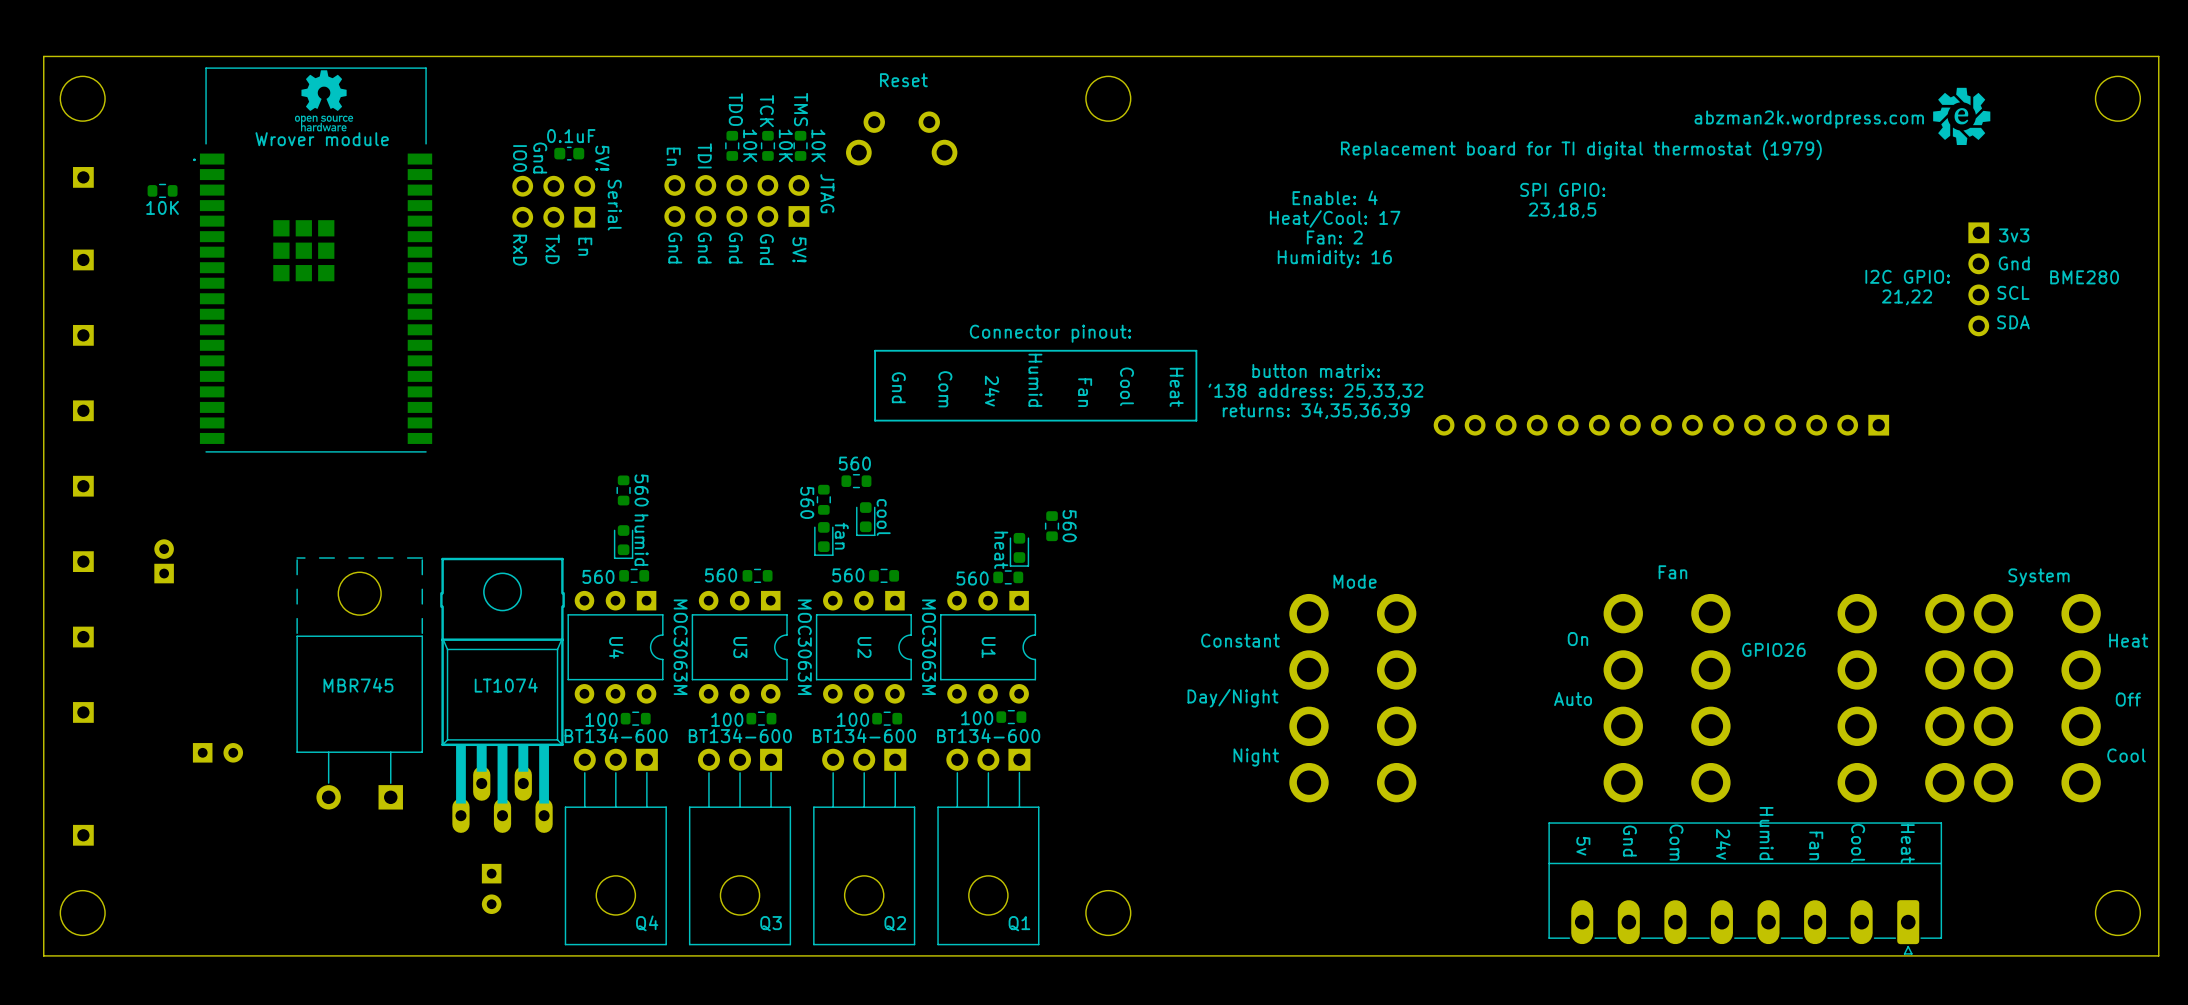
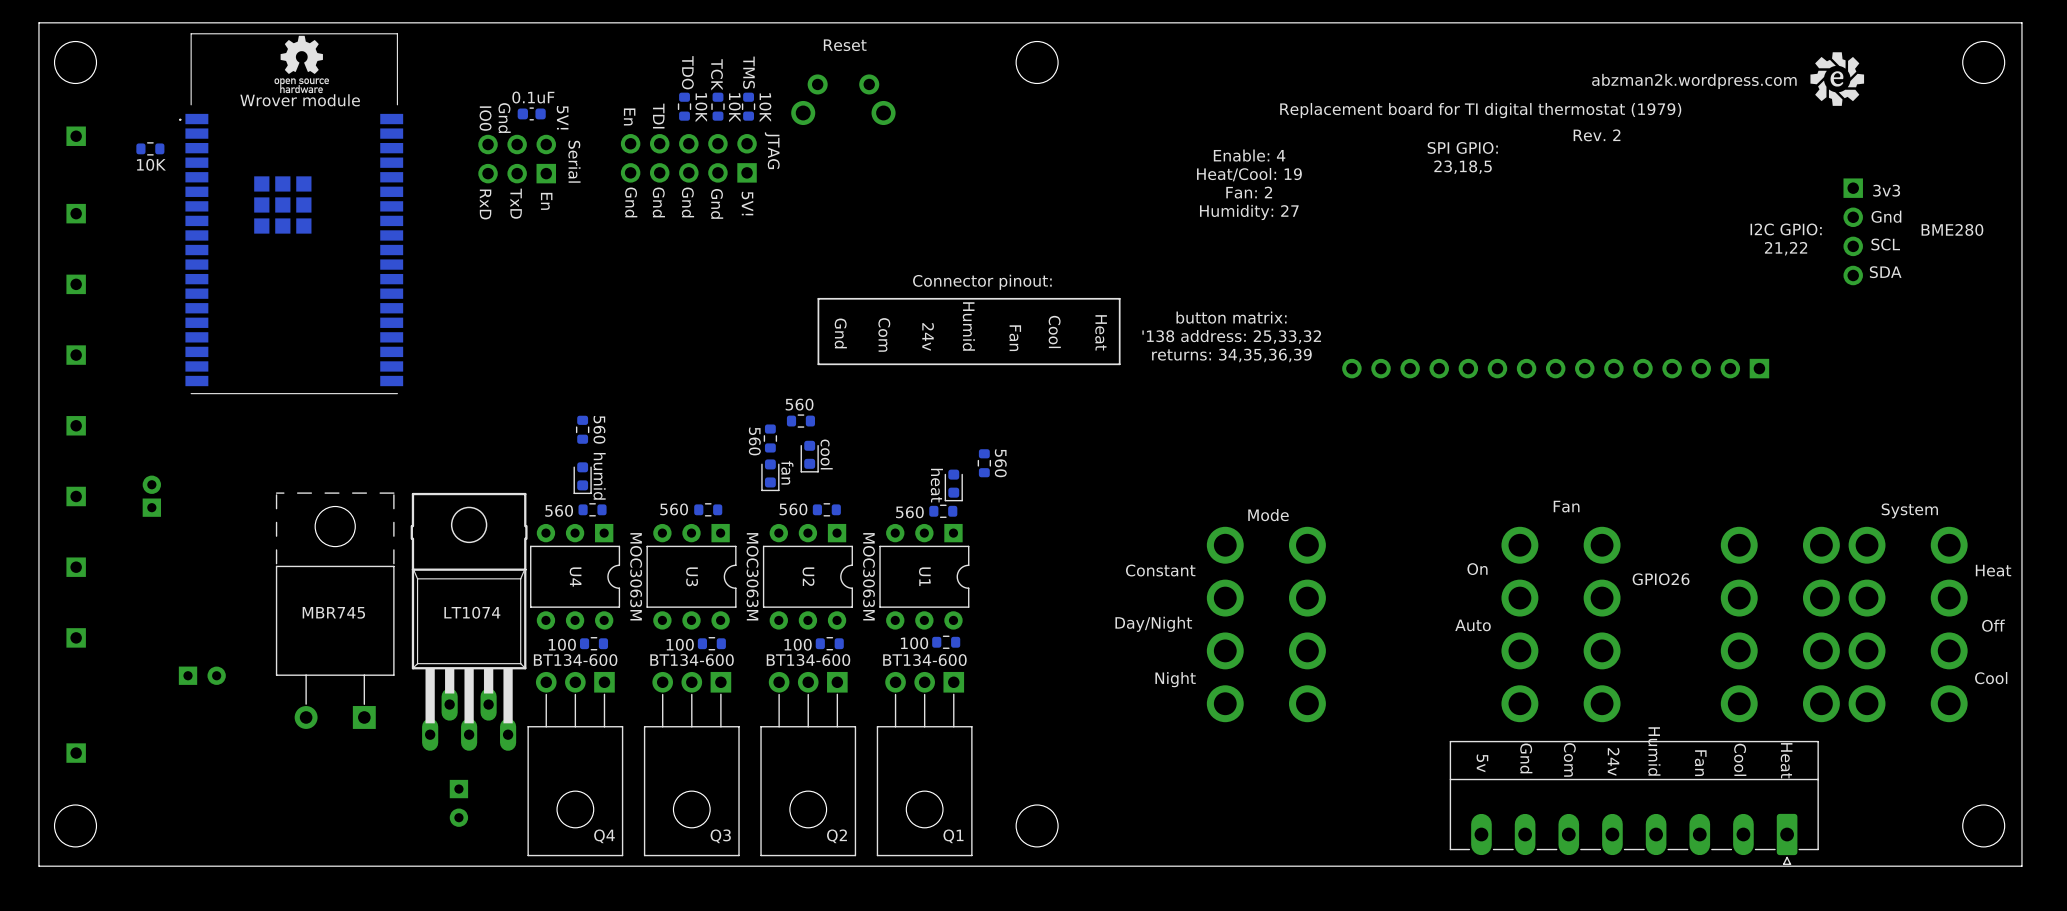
text: none -> Rev. 2 (1597, 135)
text: Heat/Cool: 17 (1335, 219) -> Heat/Cool: 19 (1249, 174)
text: Humidity: 16 (1334, 259) -> Humidity: 27 (1249, 212)

